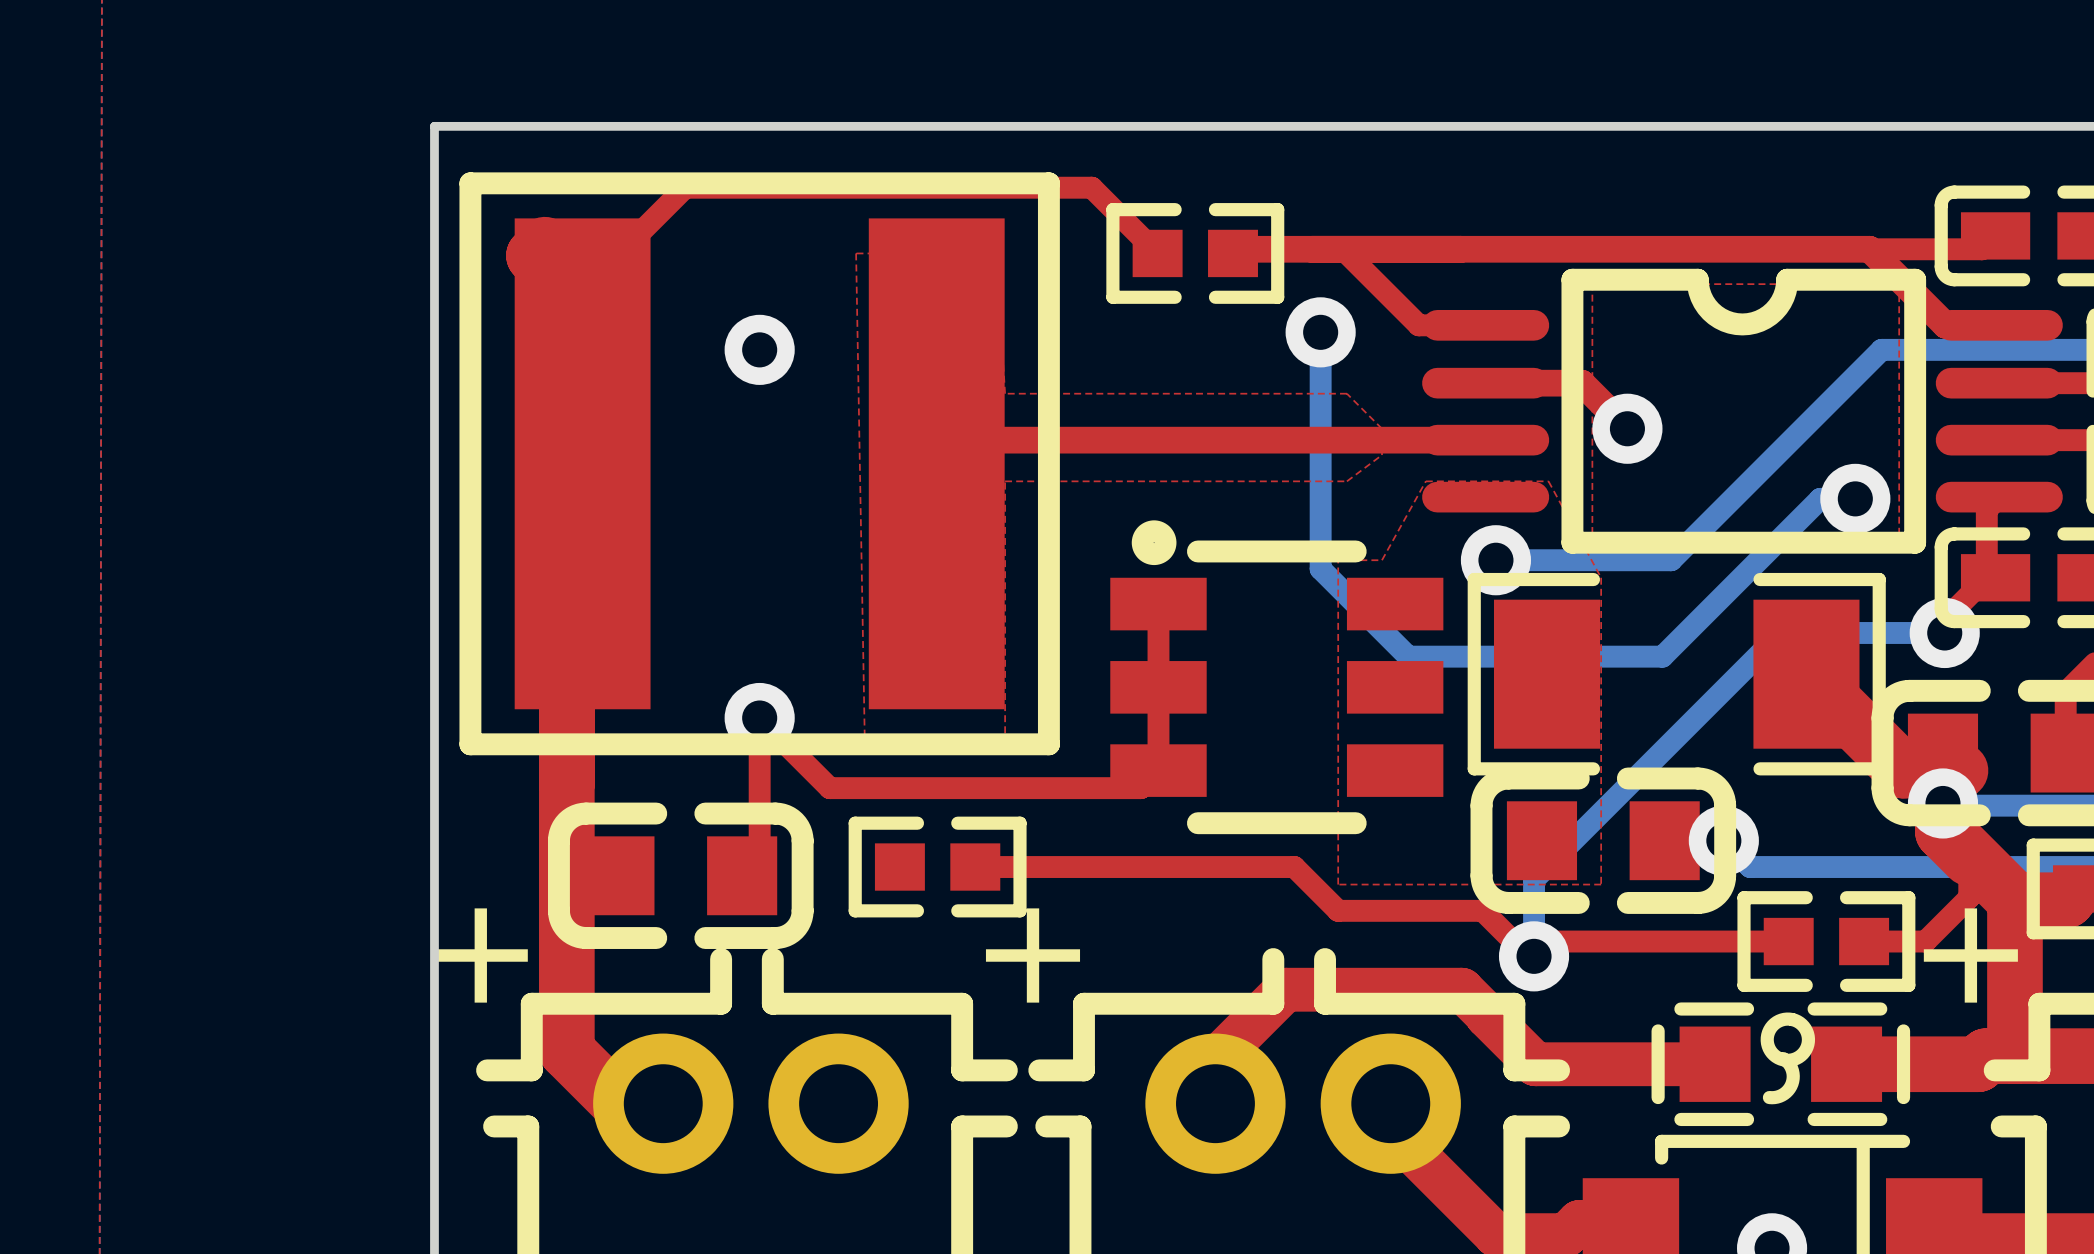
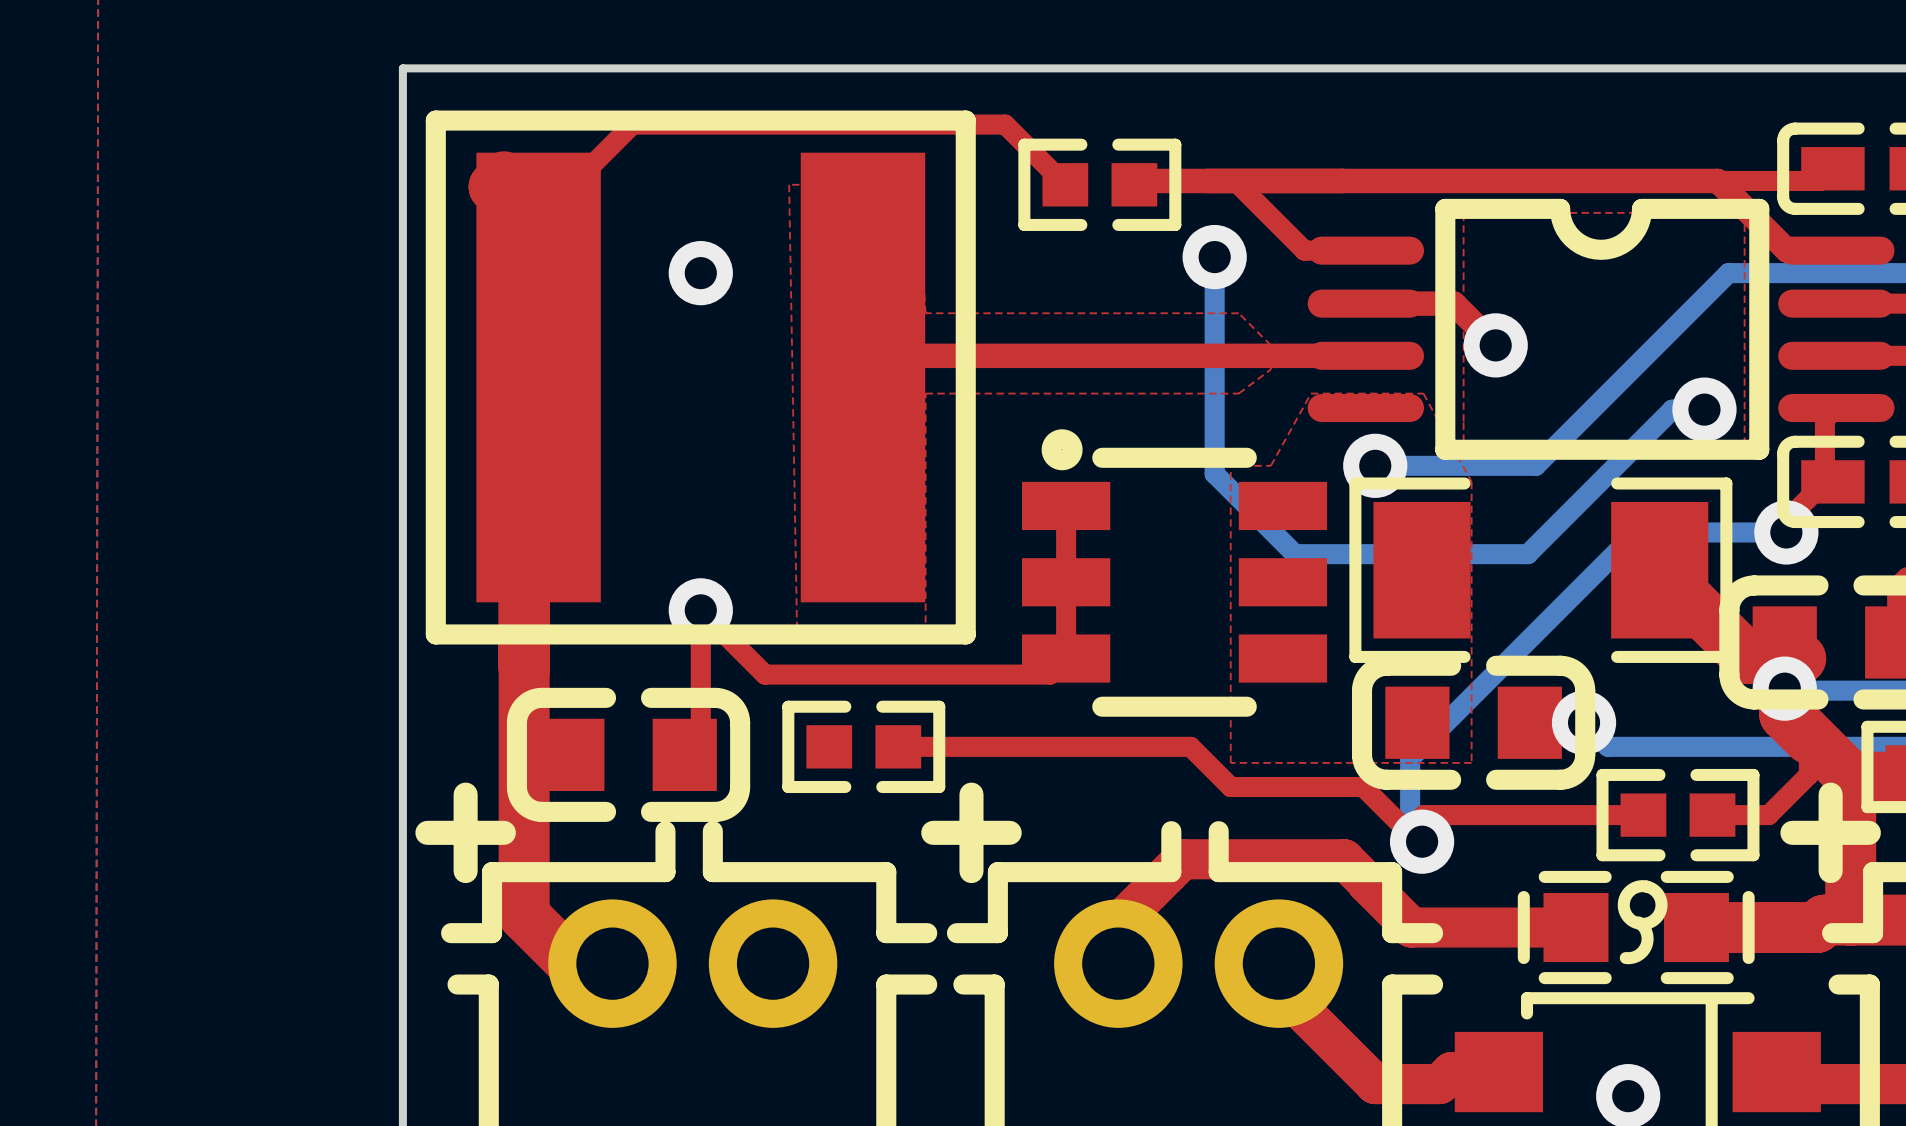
via position: (1534, 956) -> (1422, 841)

